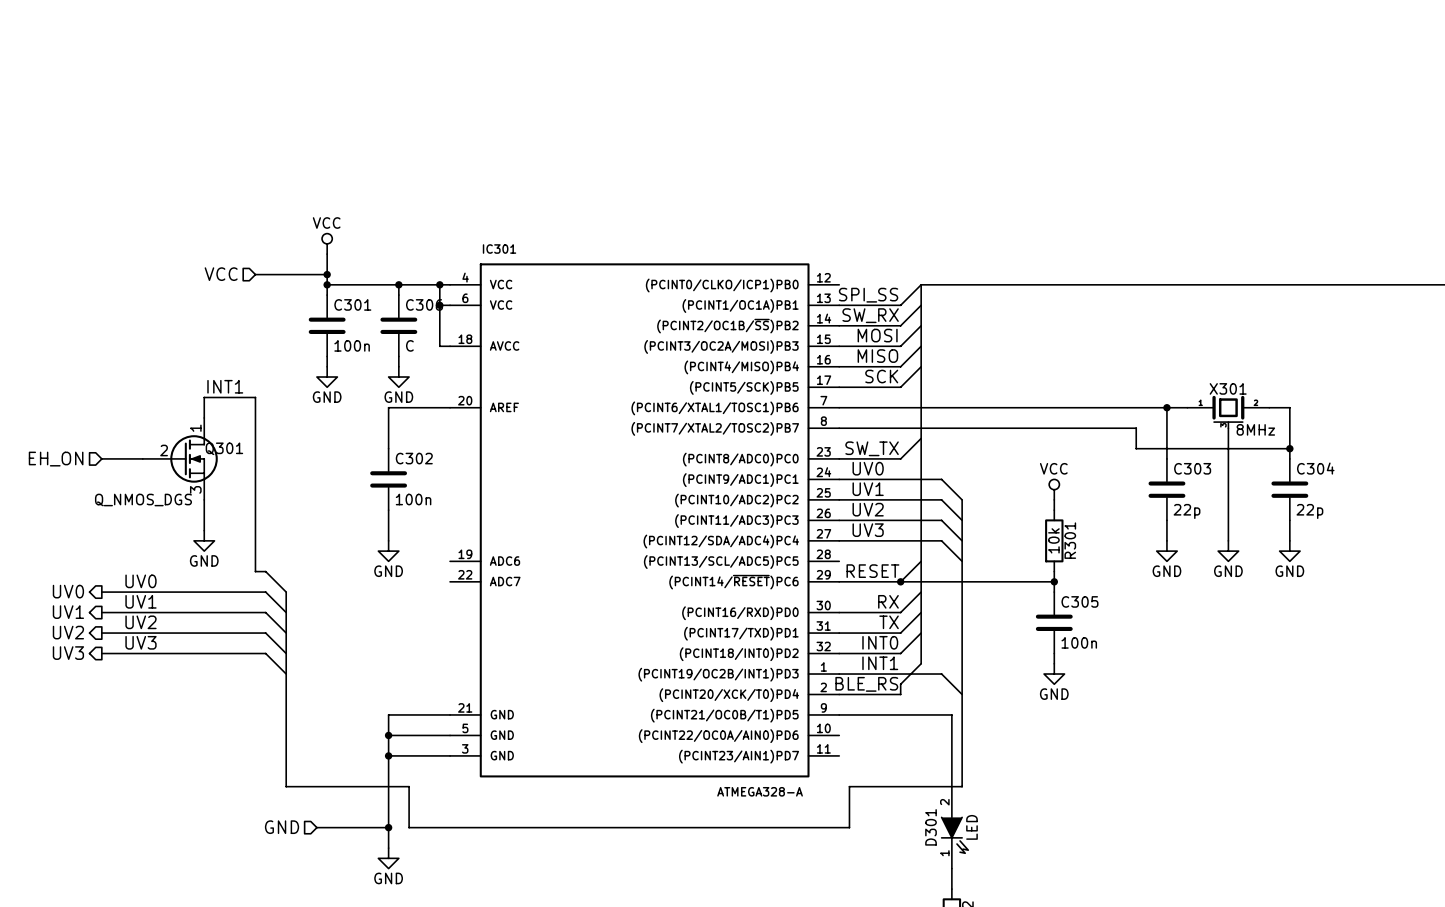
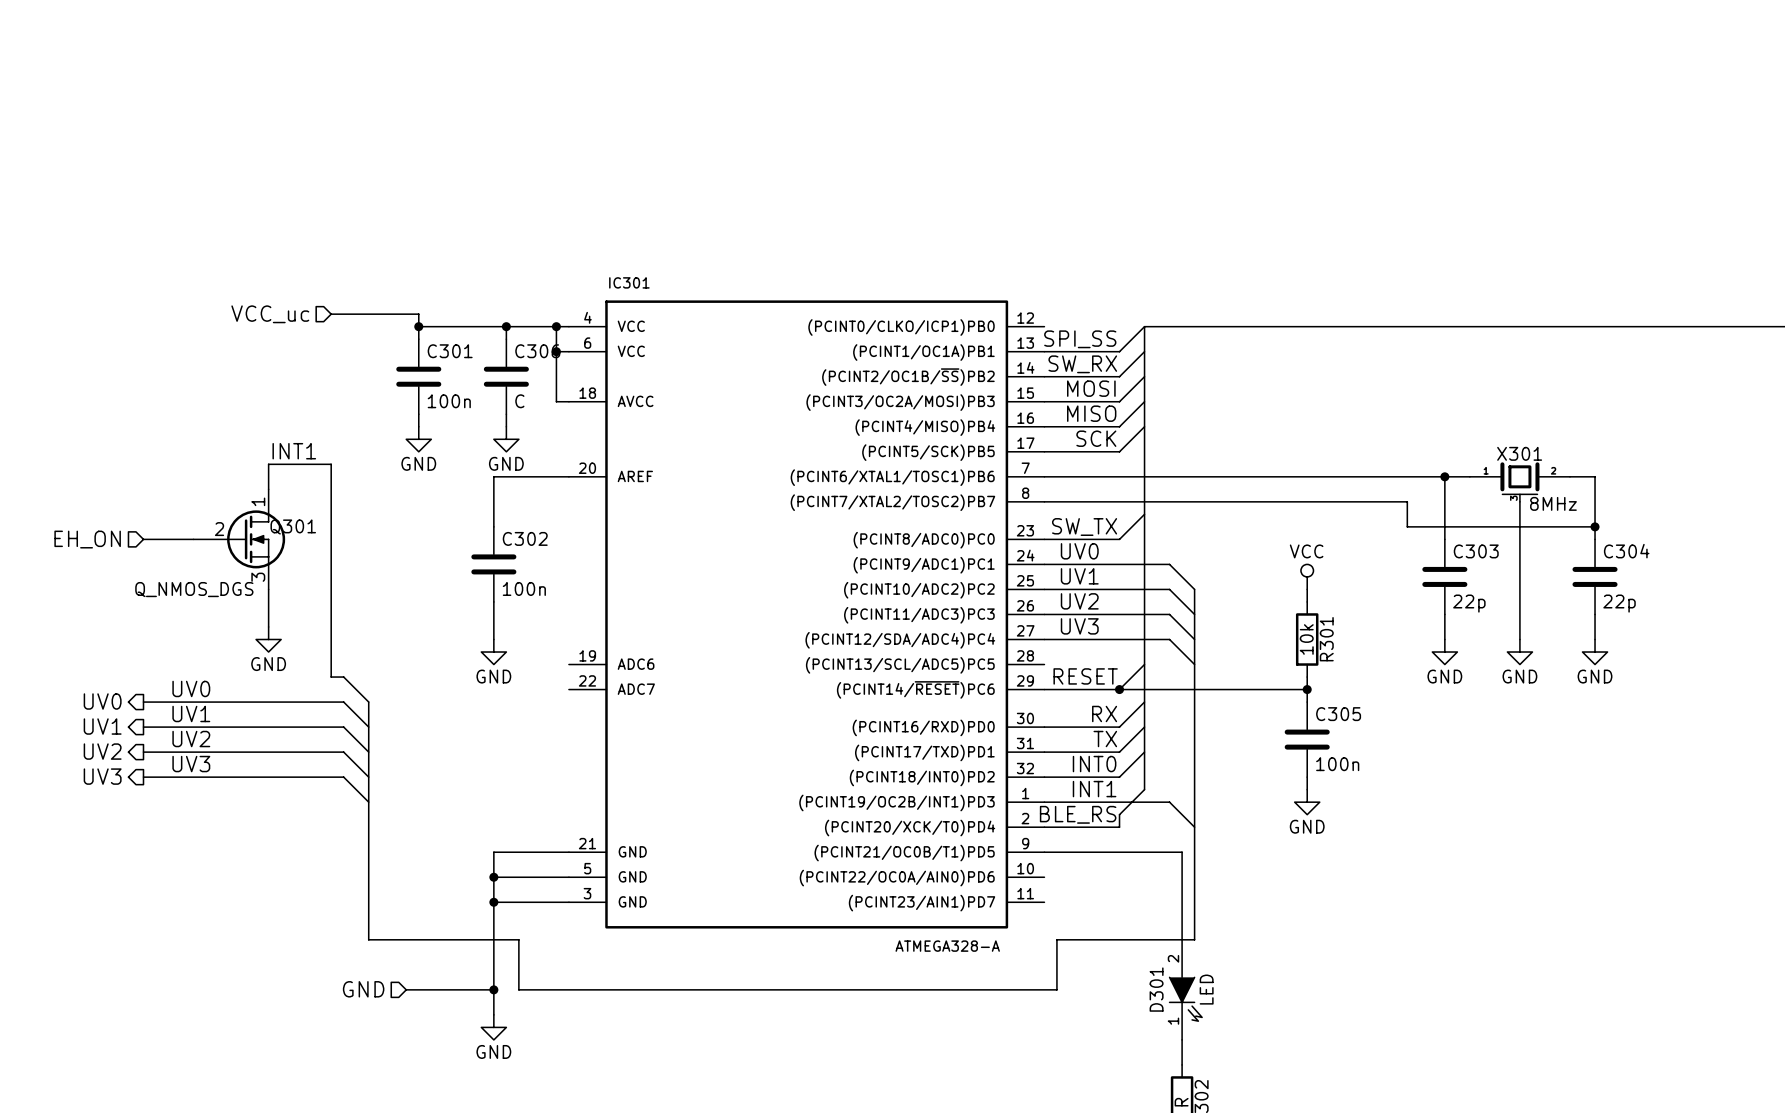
power symbol: VCC (327, 243) -> none
wire: (327, 254) (327, 274) -> none
hierarchical label: VCC (221, 274) -> VCC_uc (270, 314)
junction: (327, 274) -> none

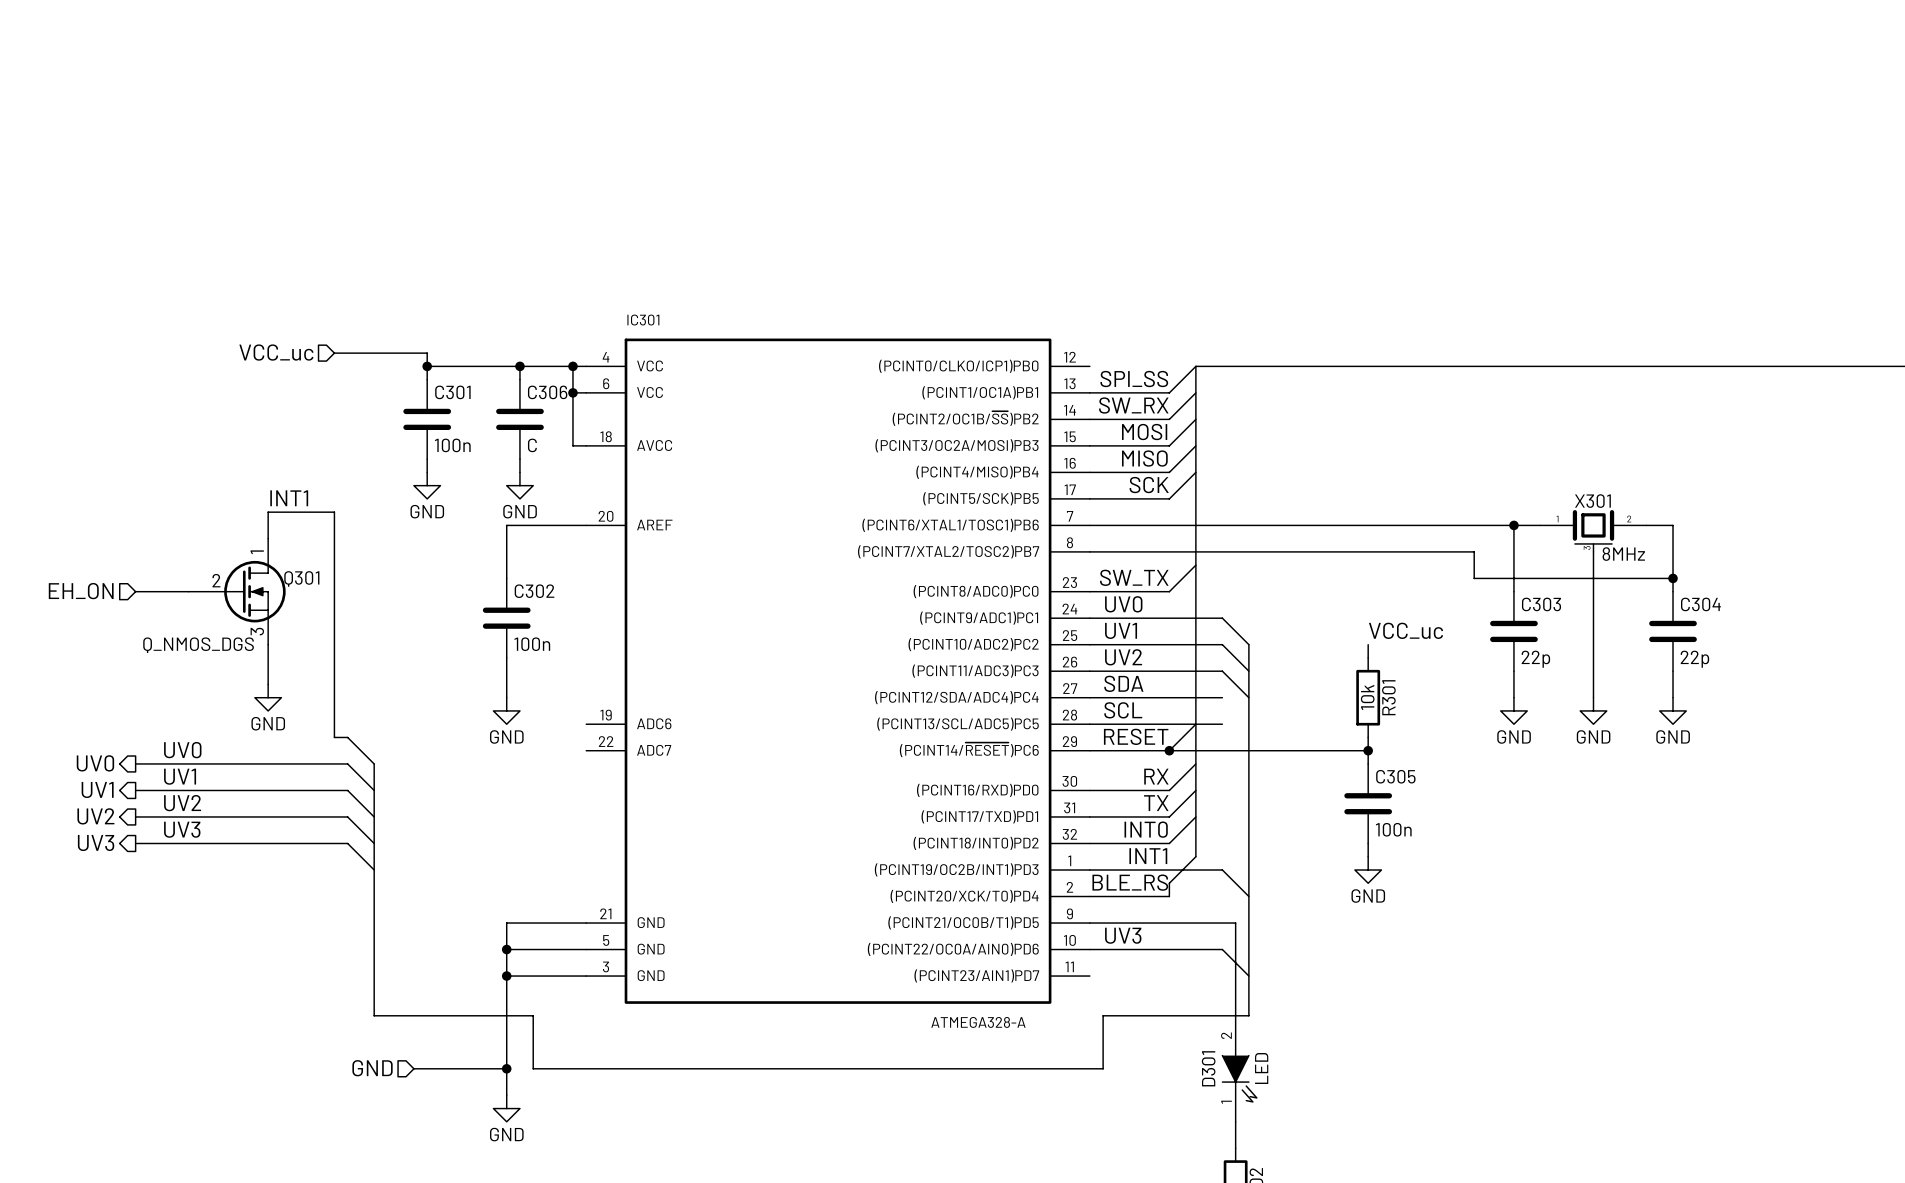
power symbol: VCC (1307, 576) -> none
label: none -> VCC_uc (1406, 630)
label: UV3 (1079, 626) -> SDA (1123, 683)
wire: (1169, 639) (1194, 664) -> none
label: none -> SCL (1123, 710)
wire: none -> (1089, 724) (1222, 724)
label: none -> UV3 (1123, 935)
wire: none -> (1089, 949) (1222, 949) (1248, 976)

